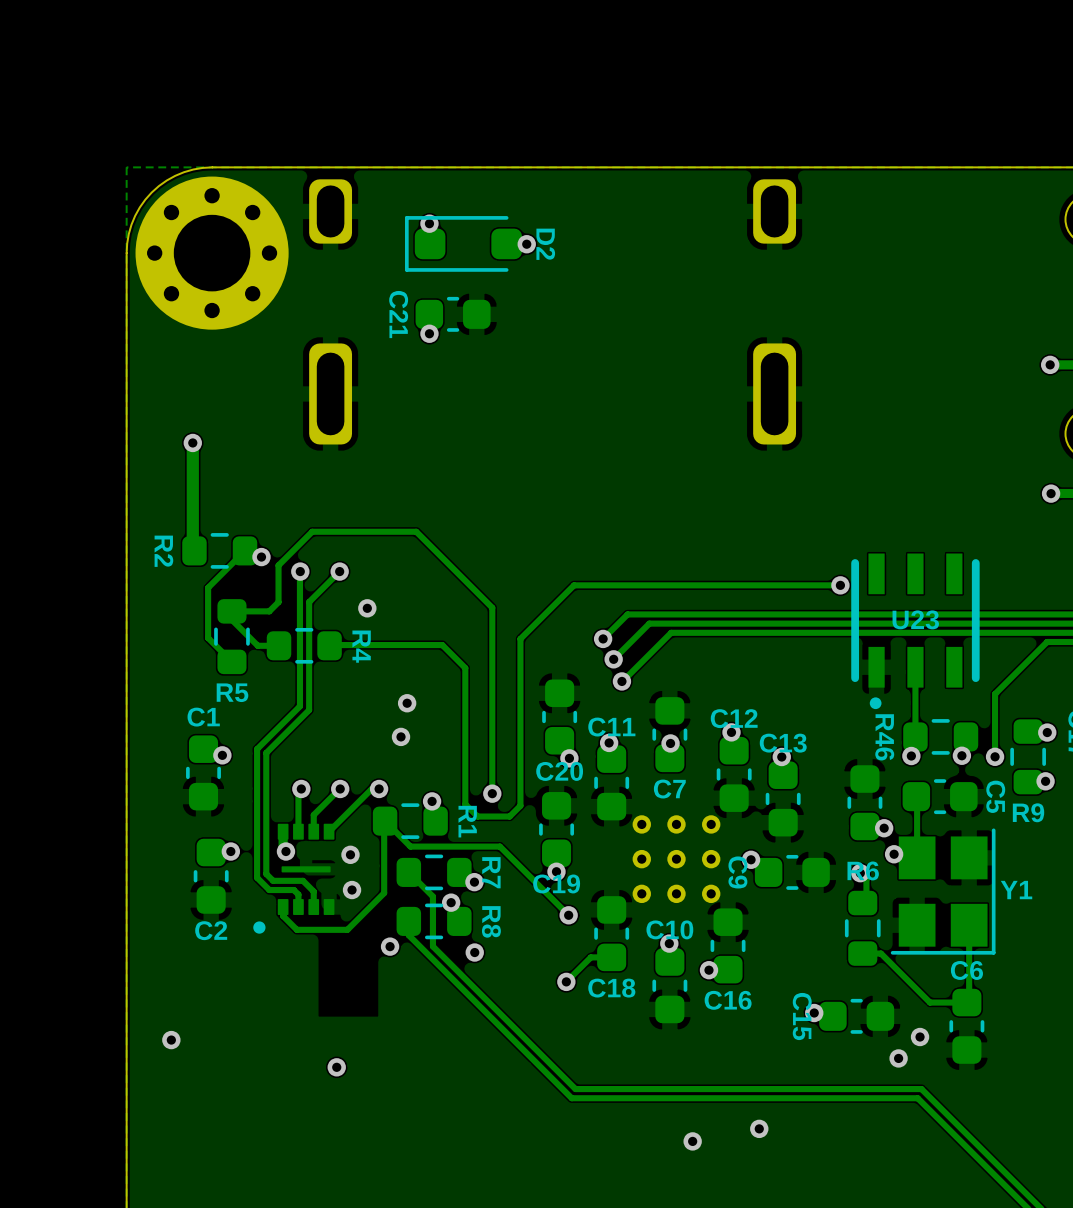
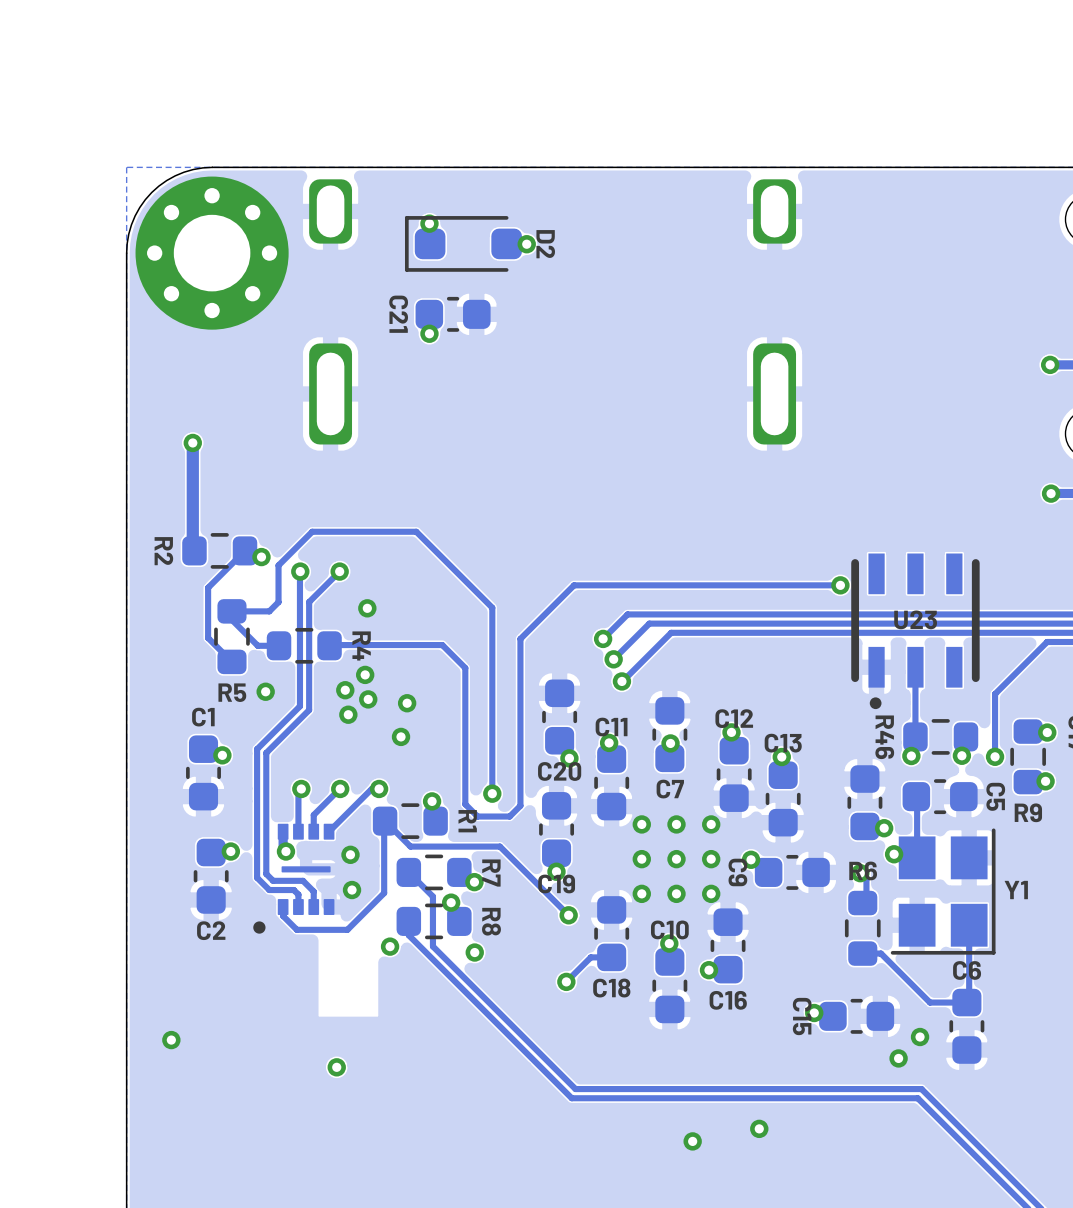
via: none -> (365, 674)
via: none -> (345, 690)
via: none -> (265, 691)
via: none -> (368, 699)
via: none -> (348, 714)

